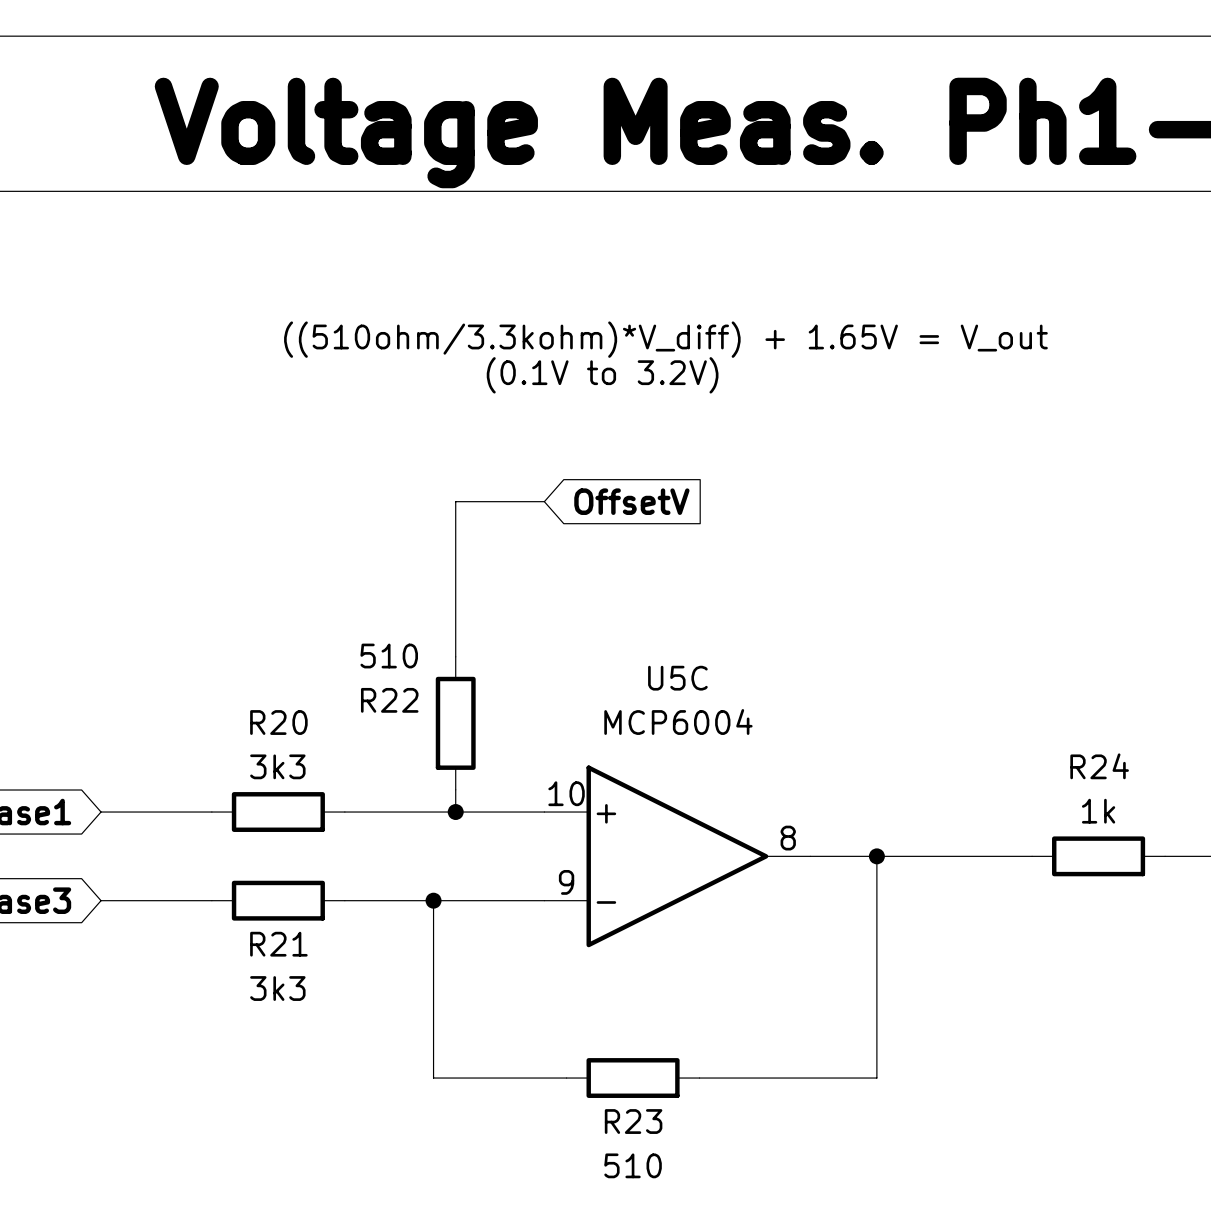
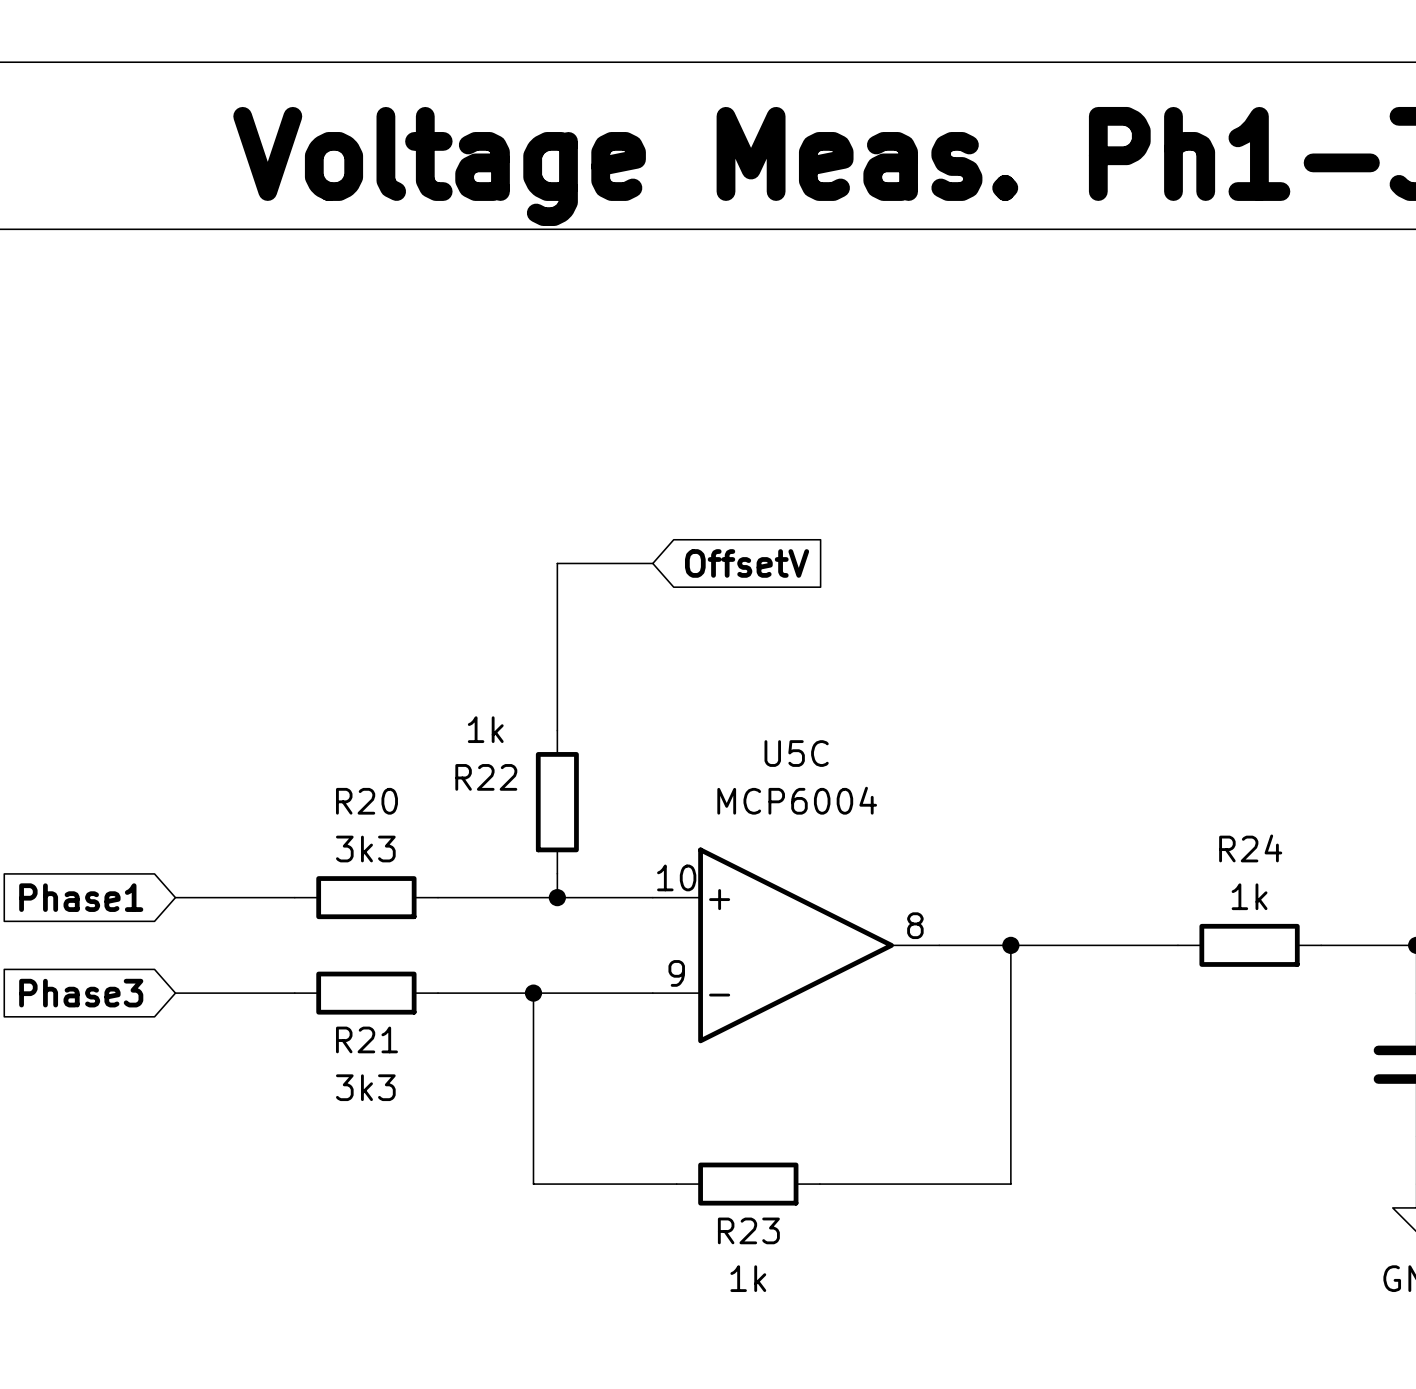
text: ((510ohm/3.3kohm)*V_diff) + 1.65V = V_out (665, 339) -> none
text: (0.1V to 3.2V) (602, 375) -> none
R22 value: 510 (389, 656) -> 1k (485, 729)
R23 value: 510 (633, 1165) -> 1k (748, 1278)

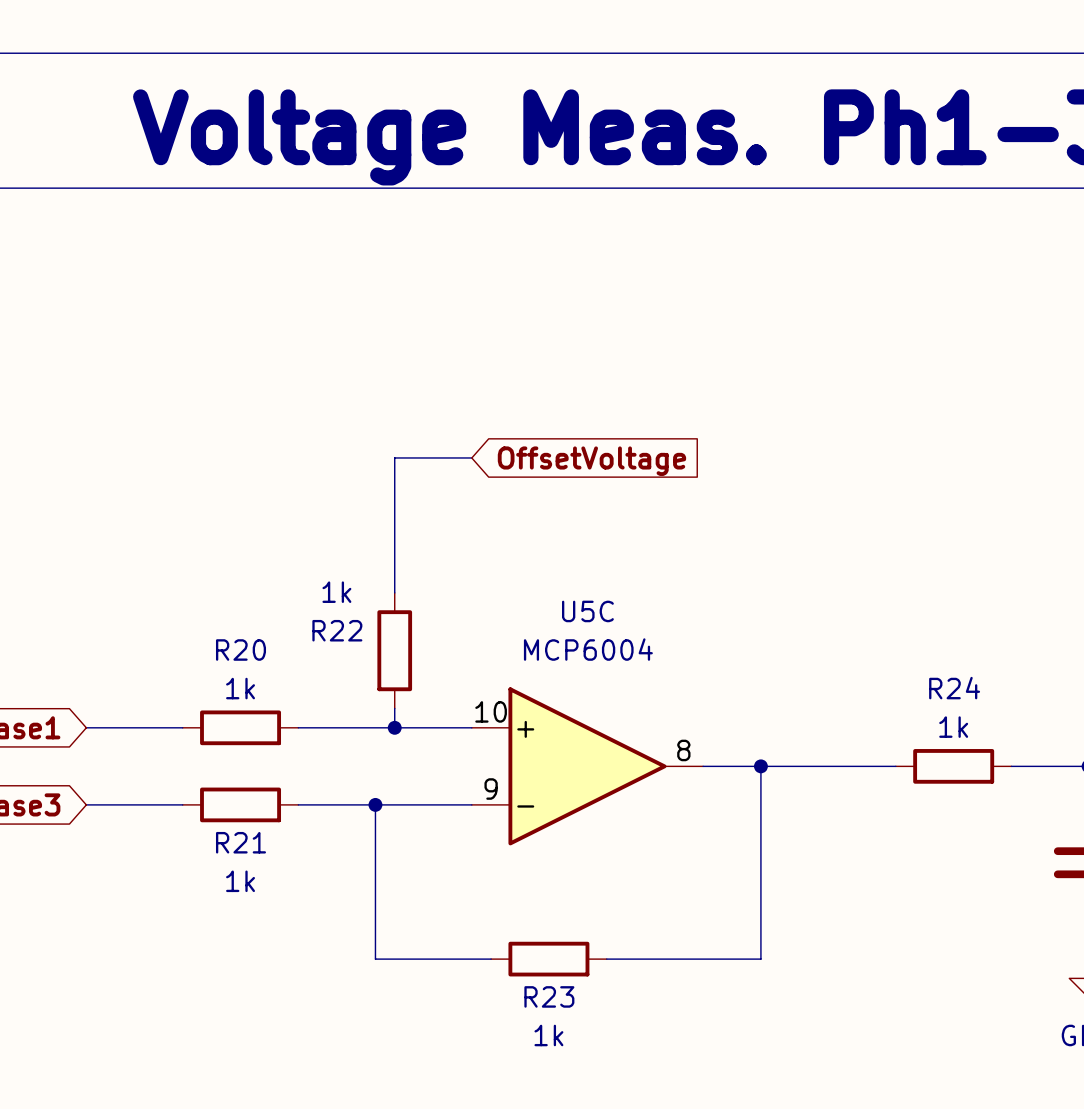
global label: OffsetV (747, 563) -> OffsetVoltage (591, 461)
R20 value: 3k3 (365, 849) -> 1k (240, 688)
R21 value: 3k3 (365, 1087) -> 1k (240, 881)

